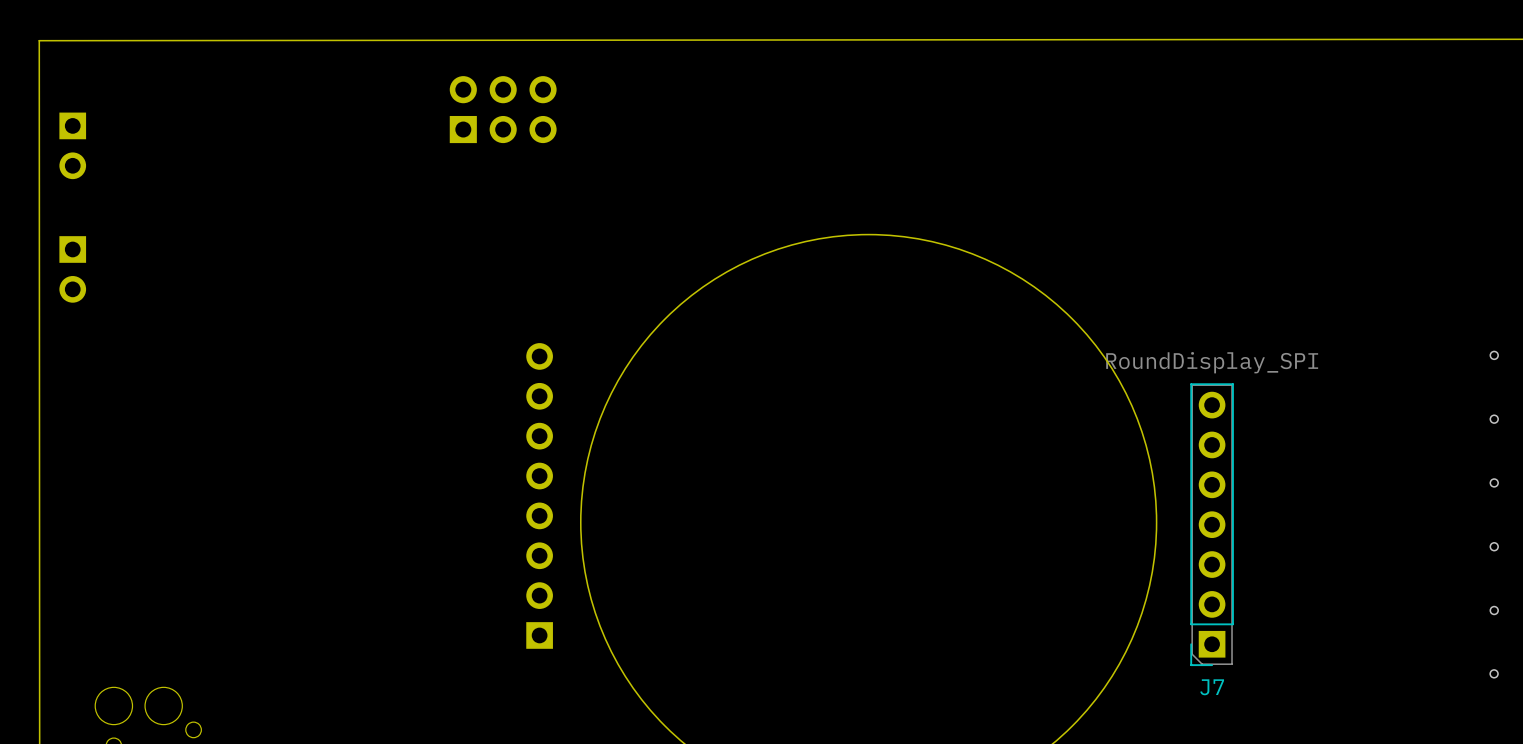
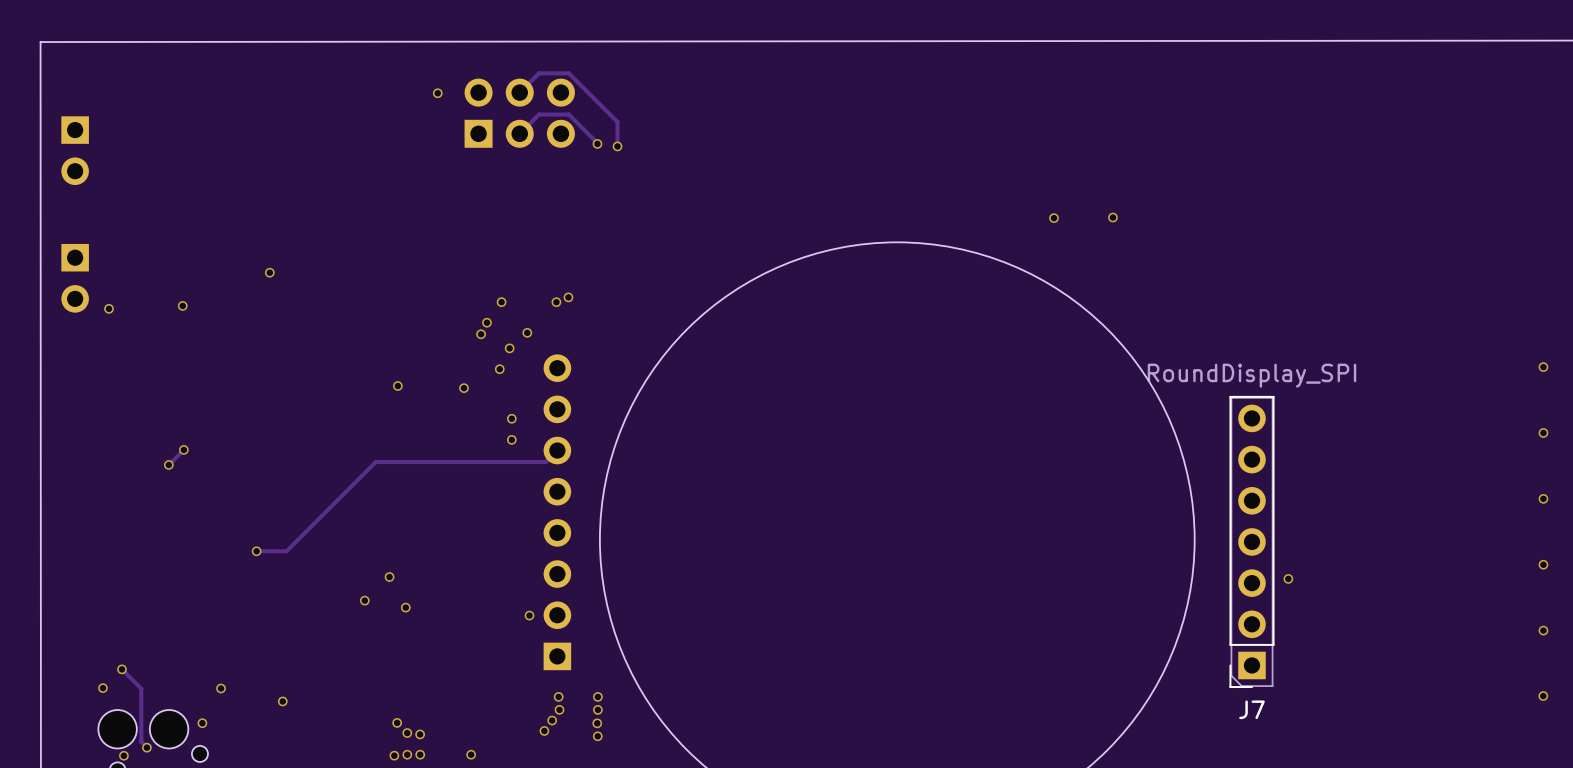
track: none -> (519, 92) (539, 73) (568, 73) (617, 121) (617, 146)
via: none -> (437, 93)
track: none -> (519, 133) (539, 114) (568, 114) (597, 143)
via: none -> (597, 143)
via: none -> (617, 146)
via: none -> (1112, 217)
via: none -> (1054, 218)
via: none -> (269, 272)
via: none -> (568, 297)
via: none -> (501, 302)
via: none -> (556, 302)
via: none -> (182, 305)
via: none -> (109, 308)
via: none -> (486, 322)
via: none -> (527, 332)
via: none -> (481, 334)
via: none -> (509, 348)
via: none -> (499, 369)
via: none -> (397, 386)
via: none -> (464, 388)
via: none -> (511, 418)
via: none -> (511, 439)
track: none -> (183, 449) (168, 464)
via: none -> (183, 449)
track: none -> (557, 450) (545, 462) (375, 462) (286, 551) (256, 551)
via: none -> (168, 464)
via: none -> (256, 551)
via: none -> (389, 577)
via: none -> (1288, 578)
via: none -> (364, 600)
via: none -> (405, 607)
via: none -> (529, 615)
track: none -> (121, 669) (141, 688) (141, 741) (146, 747)
via: none -> (121, 669)
via: none -> (102, 688)
via: none -> (221, 688)
via: none -> (558, 696)
via: none -> (597, 696)
via: none -> (282, 701)
via: none -> (559, 709)
via: none -> (597, 709)
via: none -> (552, 720)
via: none -> (397, 722)
via: none -> (202, 723)
via: none -> (597, 723)
via: none -> (544, 730)
via: none -> (407, 733)
via: none -> (420, 734)
via: none -> (597, 736)
via: none -> (146, 747)
via: none -> (407, 754)
via: none -> (420, 754)
via: none -> (471, 754)
via: none -> (123, 755)
via: none -> (394, 755)

